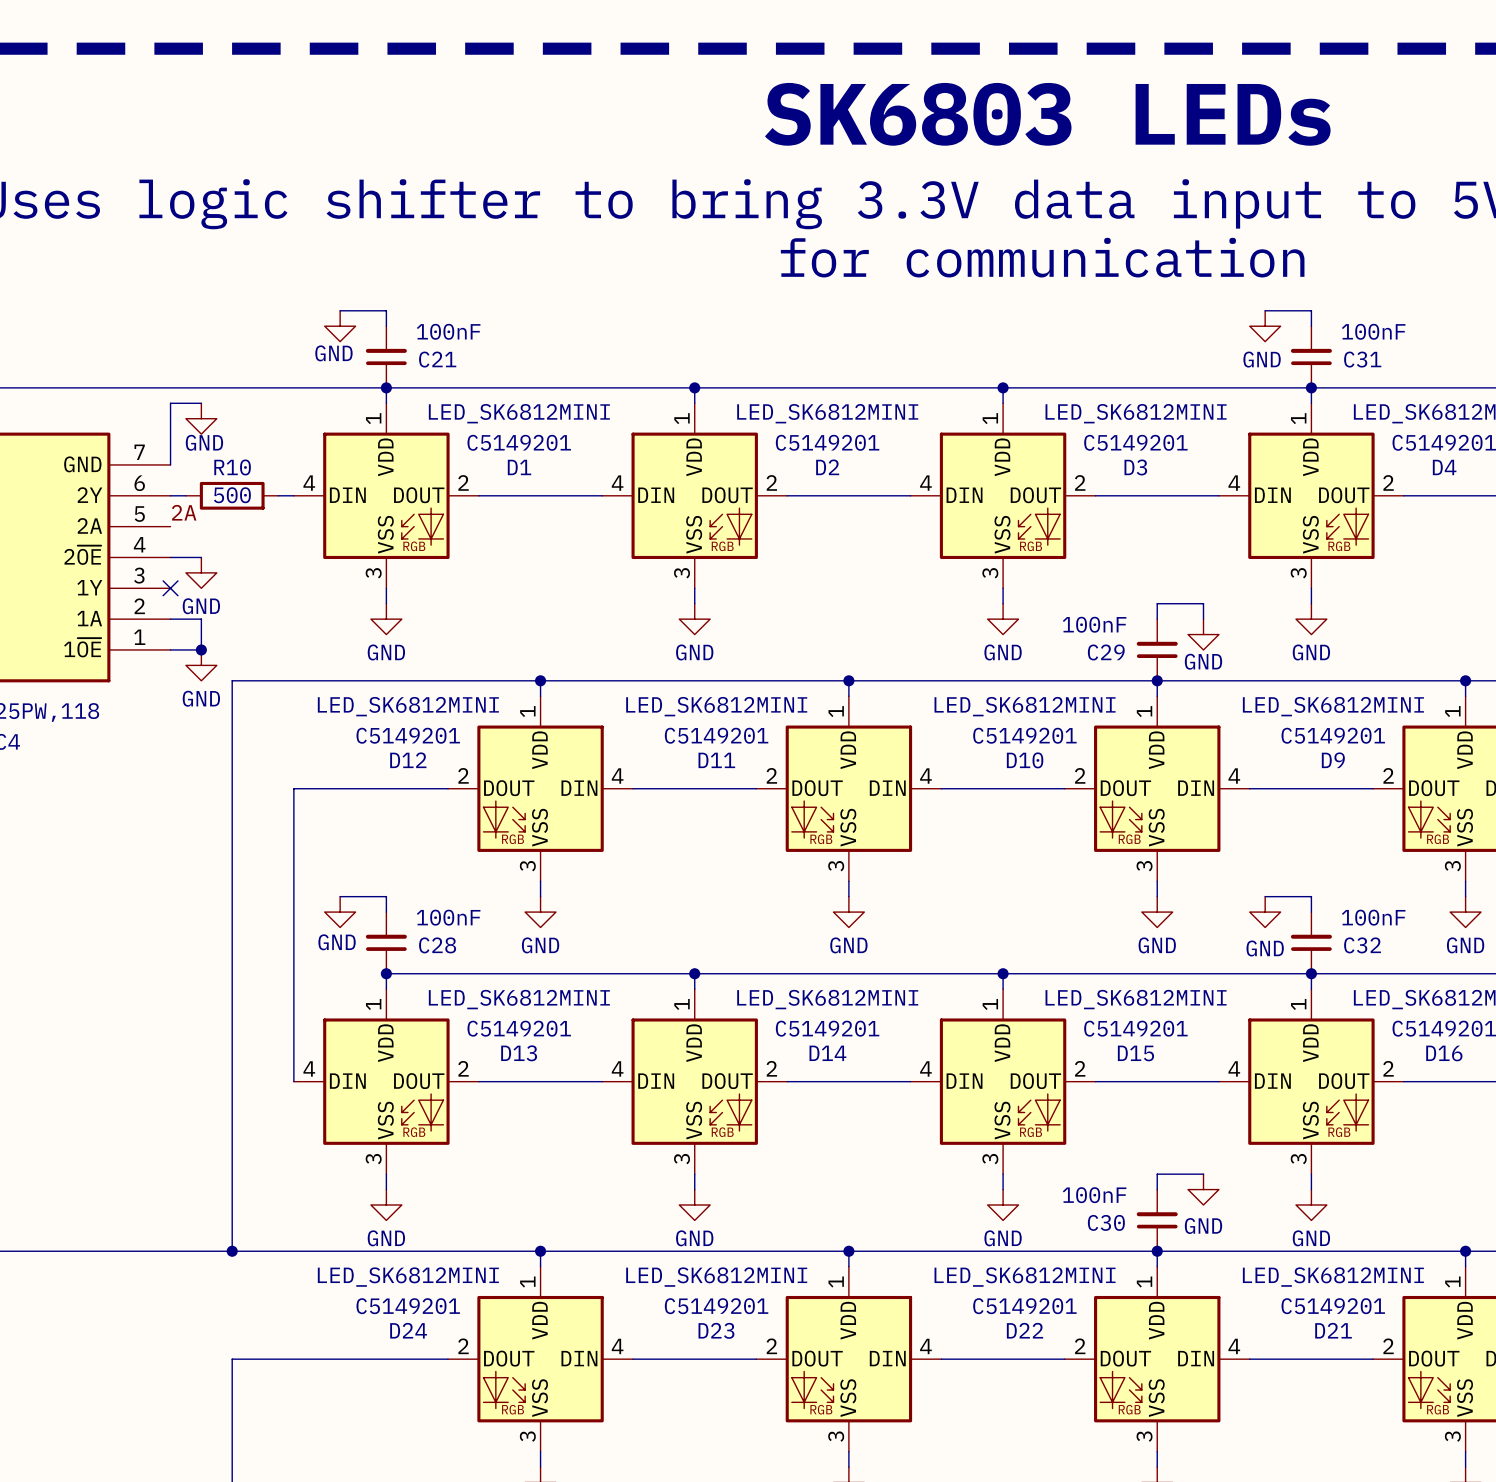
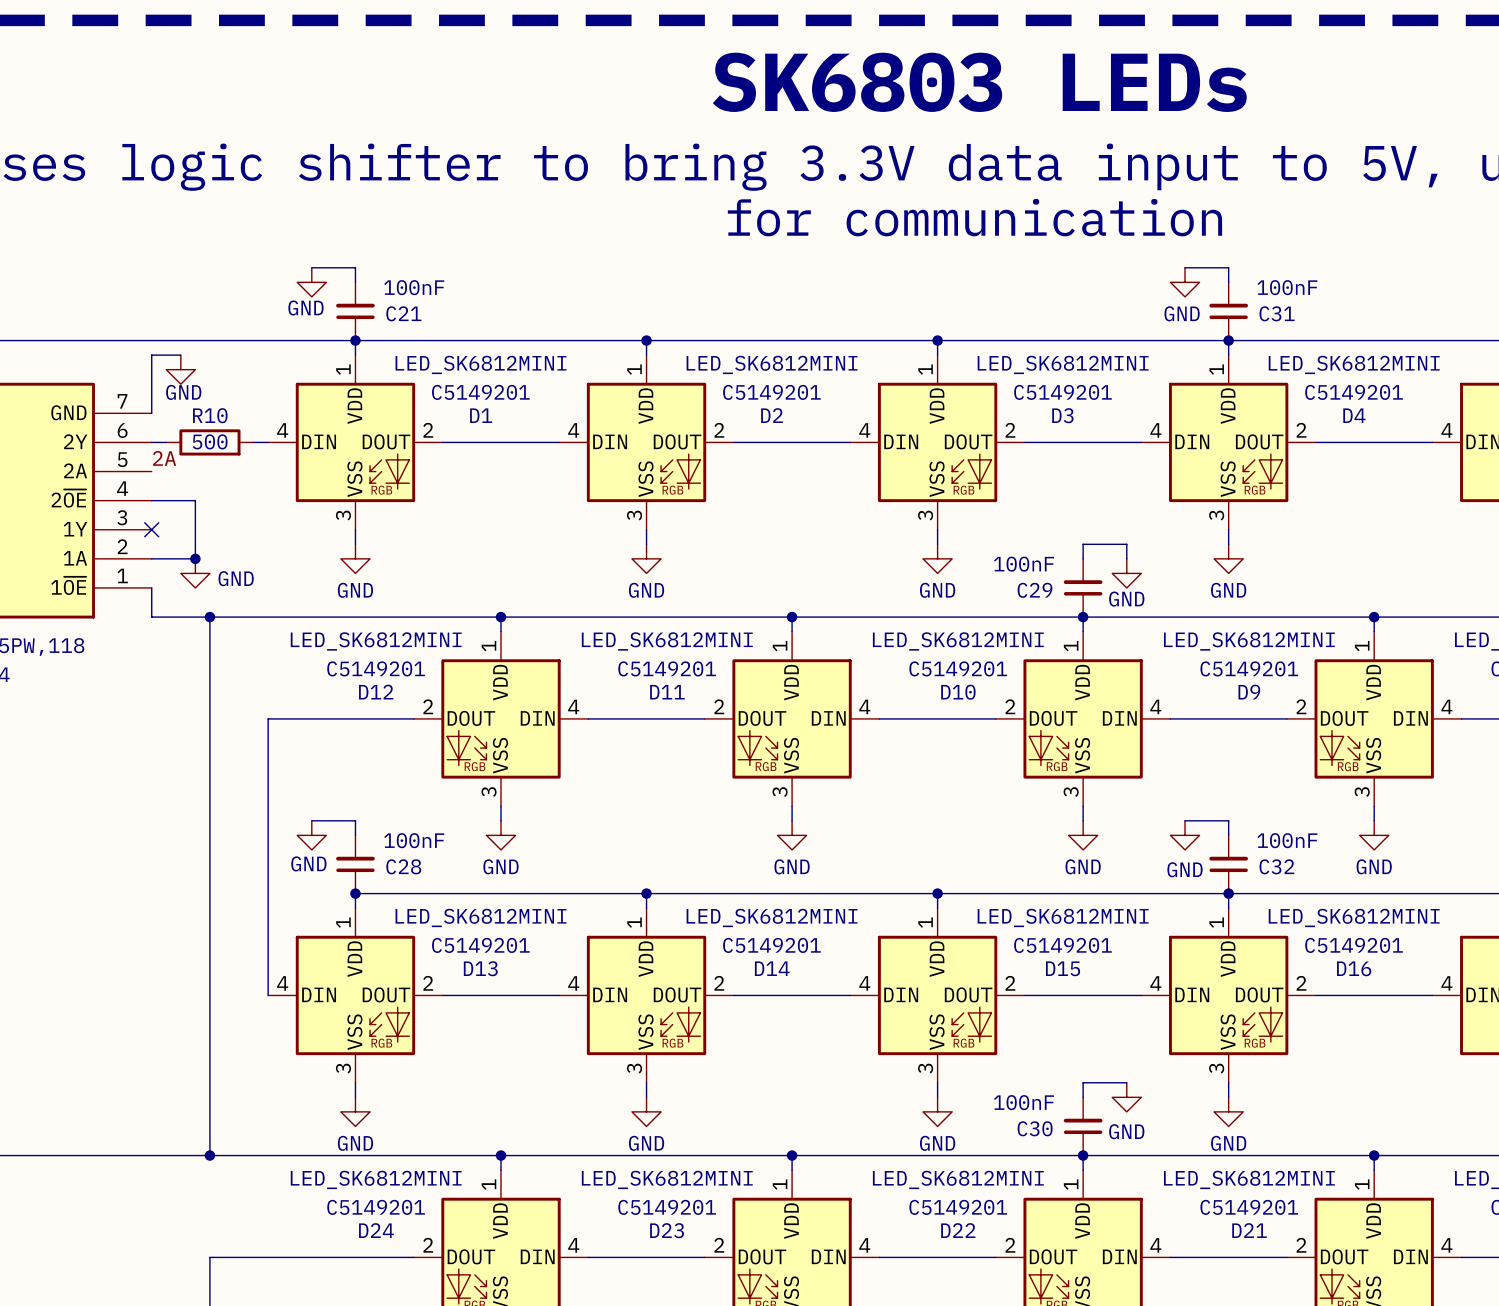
wire: none -> (180, 500) (195, 500) (195, 558) (180, 558)
power symbol: GND (201, 572) -> none
wire: (201, 619) (201, 649) (170, 649) -> (209, 617) (151, 617) (151, 587)
junction: none -> (195, 558)
power symbol: none -> GND (195, 573)
junction: (201, 649) -> none
power symbol: GND (201, 665) -> none
junction: none -> (209, 617)

